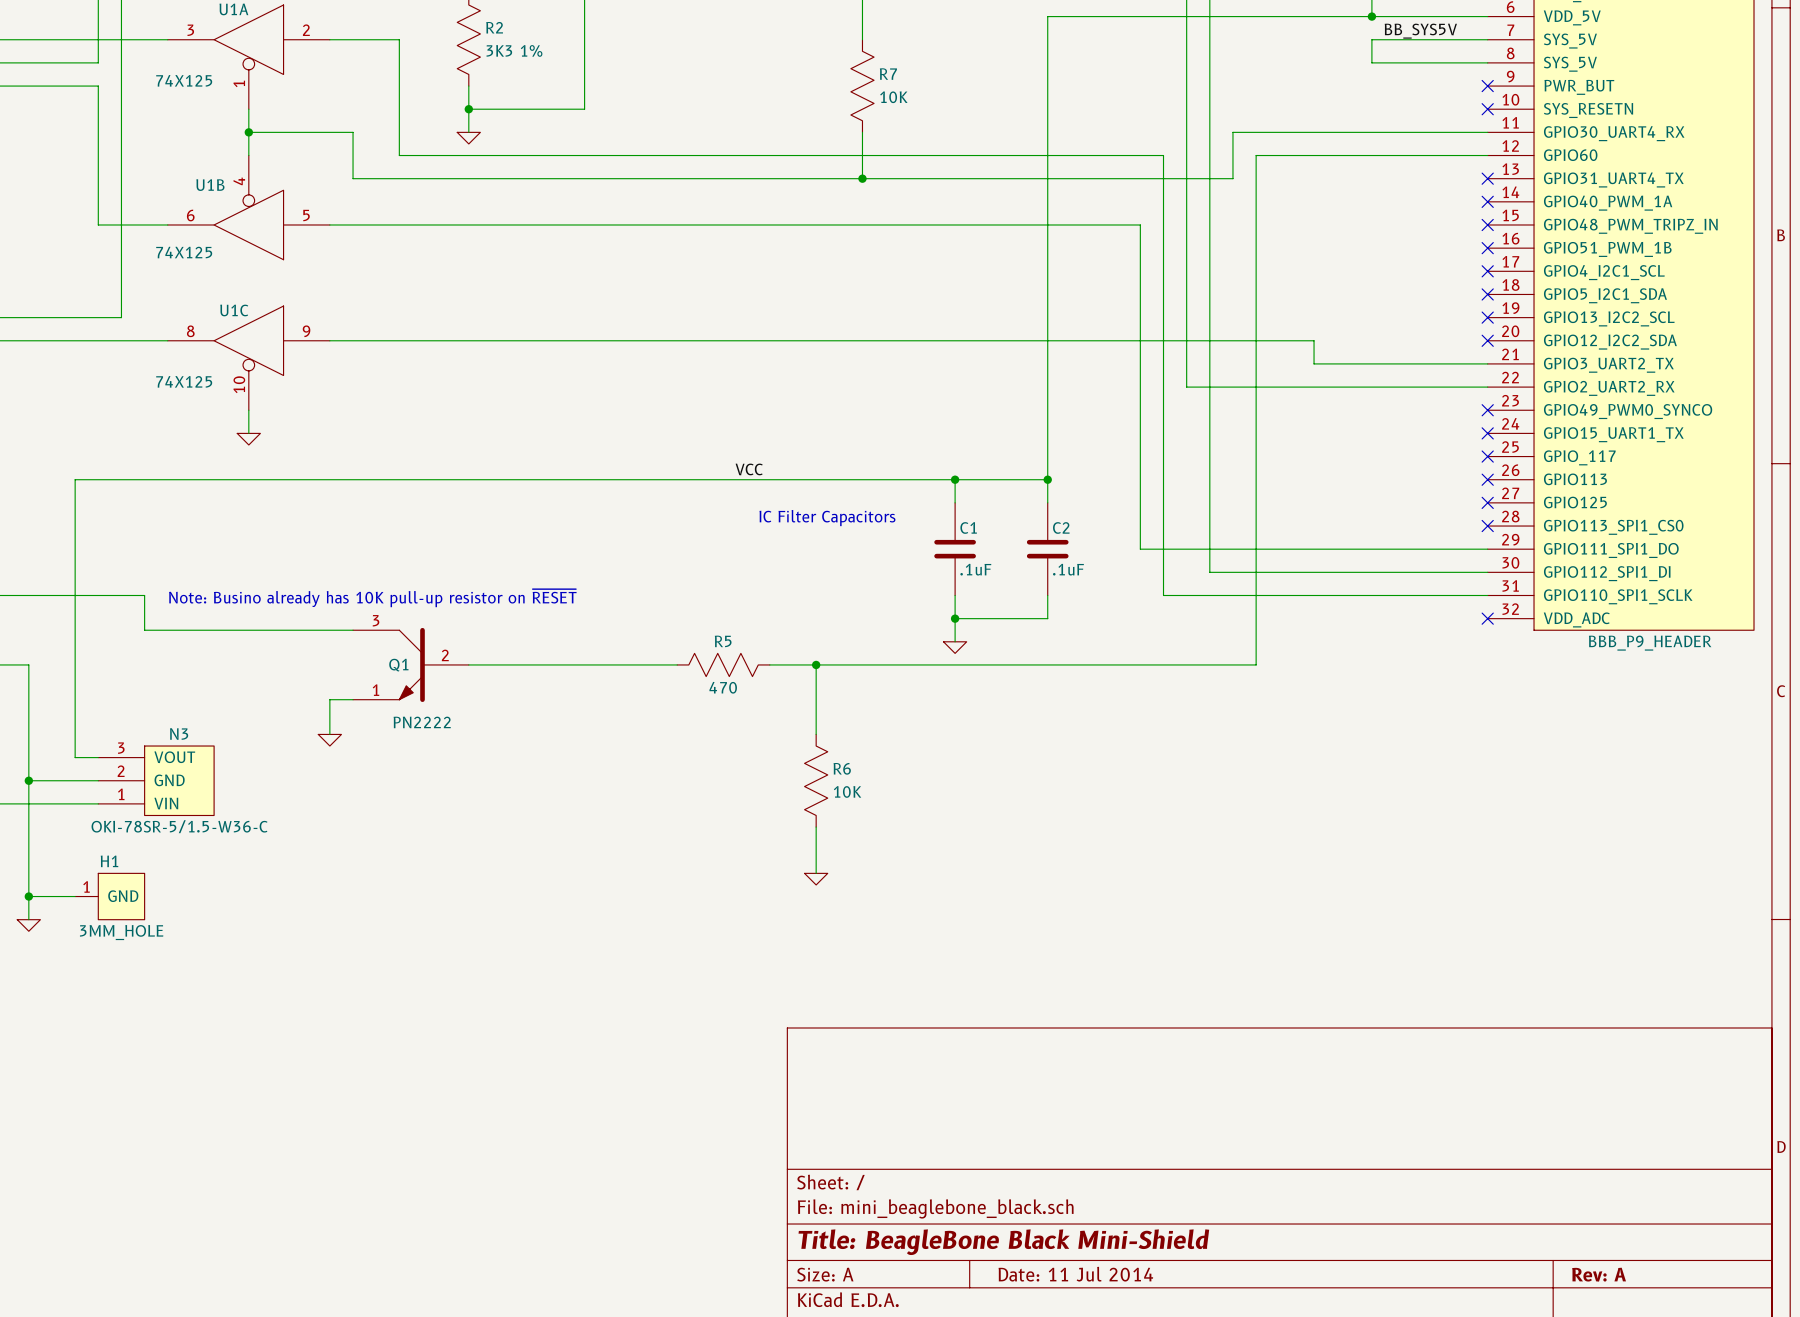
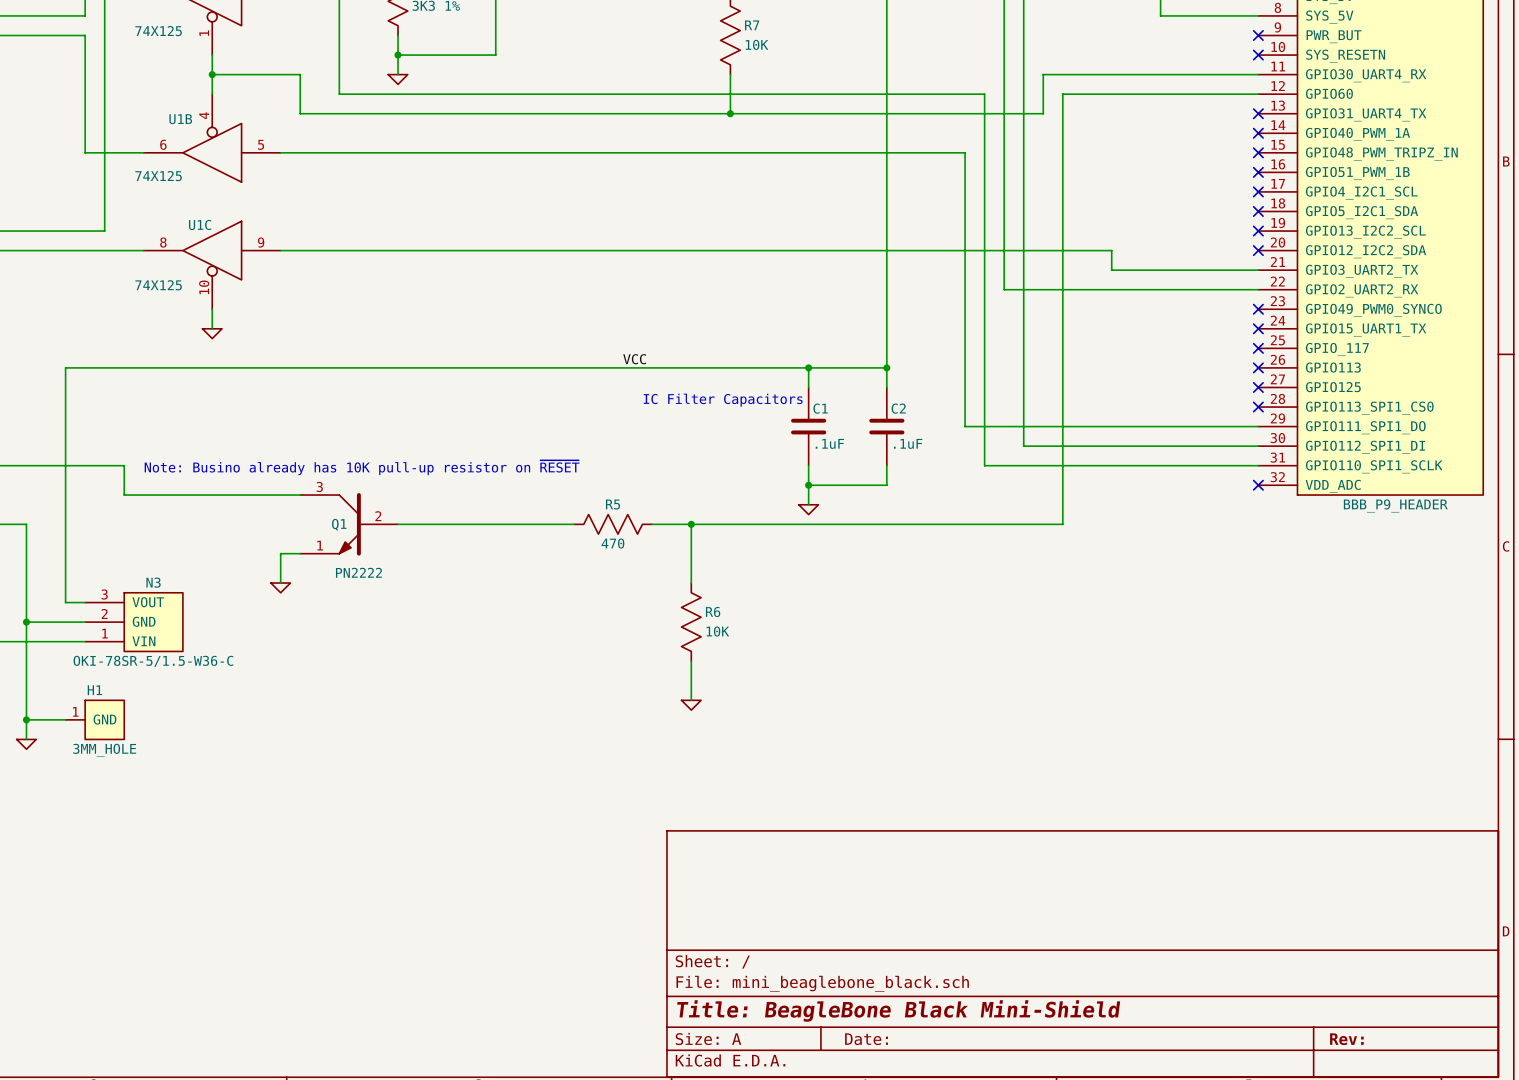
title block: Date: 11 Jul 2014 (1075, 1274) -> Date: (866, 1039)
title block: Rev: A (1599, 1274) -> Rev: (1346, 1039)

